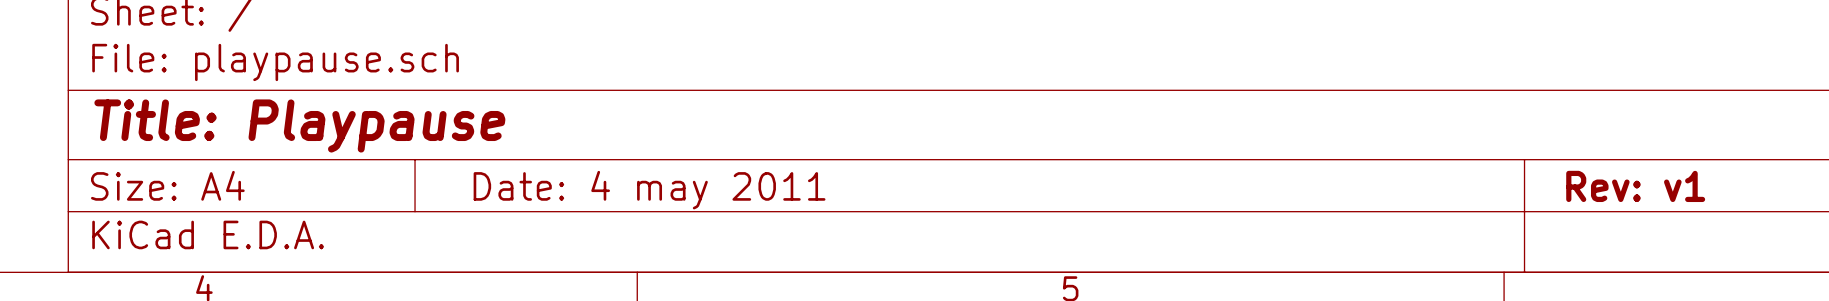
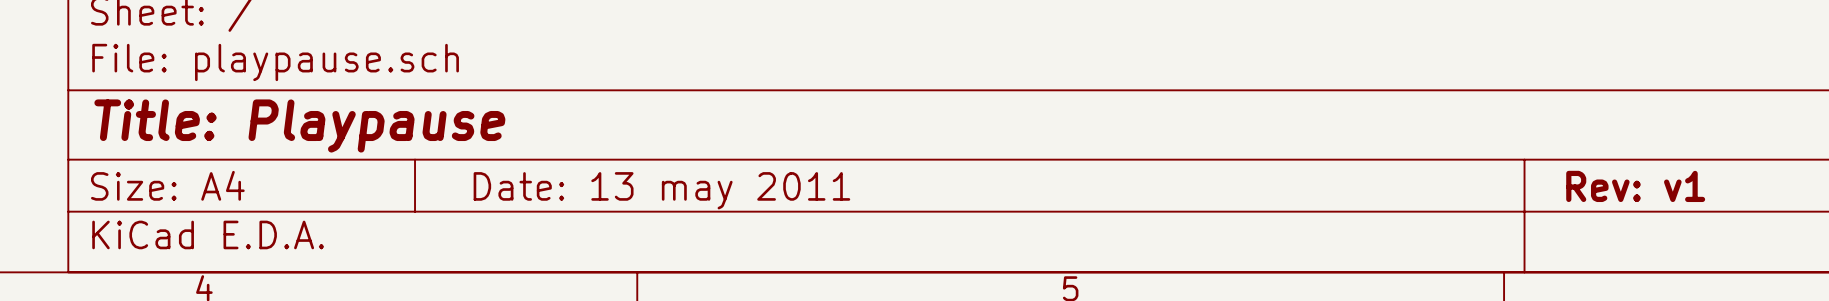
title block: Date: 4 may 2011 (649, 190) -> Date: 13 may 2011 (661, 190)

